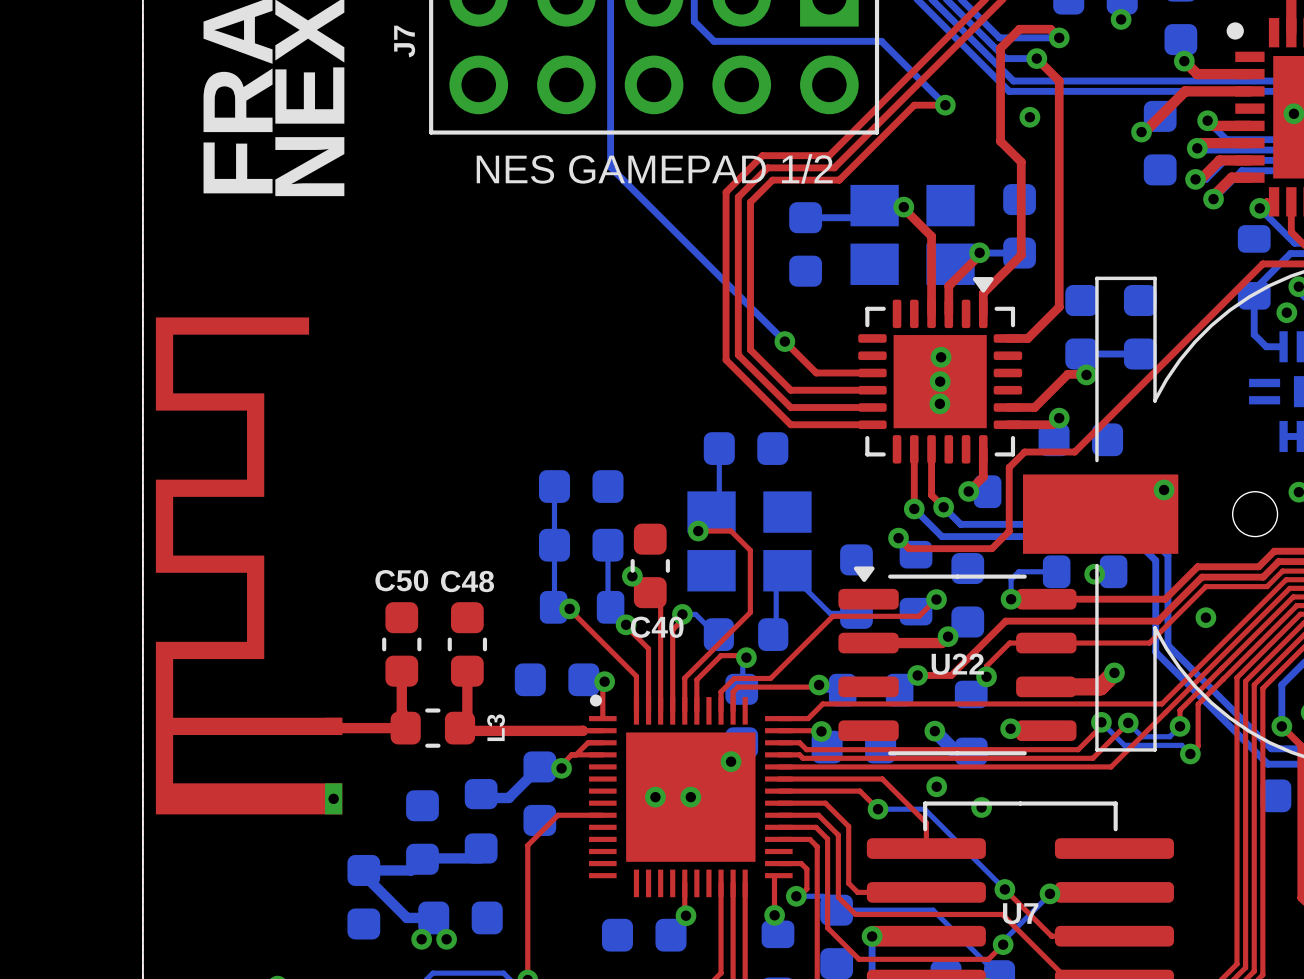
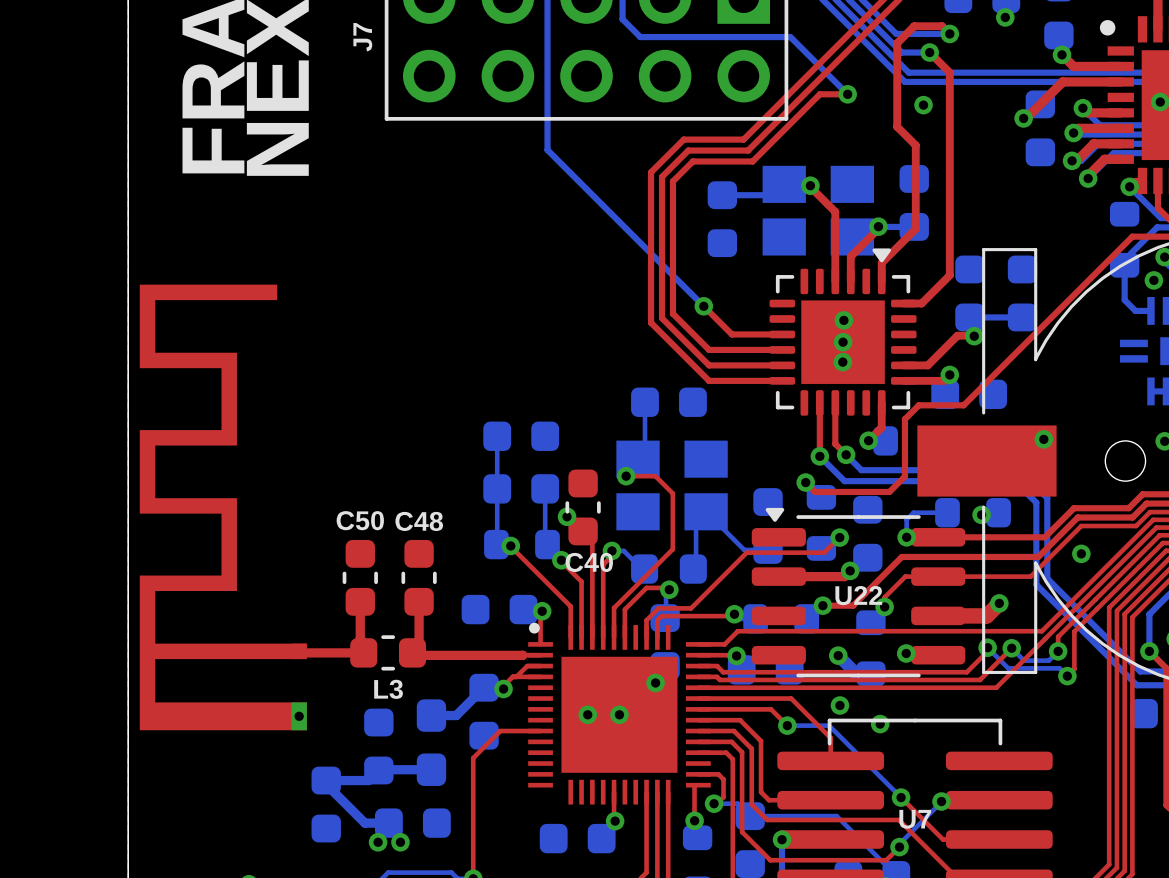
text: NES GAMEPAD 1/2 (654, 168) -> none
L3 name rotation: 0° (496, 727) -> 90° clockwise (388, 689)
L3 name position: L3 (496, 727) -> L3 (388, 689)
part footprint: [464, 779, 498, 864] -> [416, 699, 447, 786]

